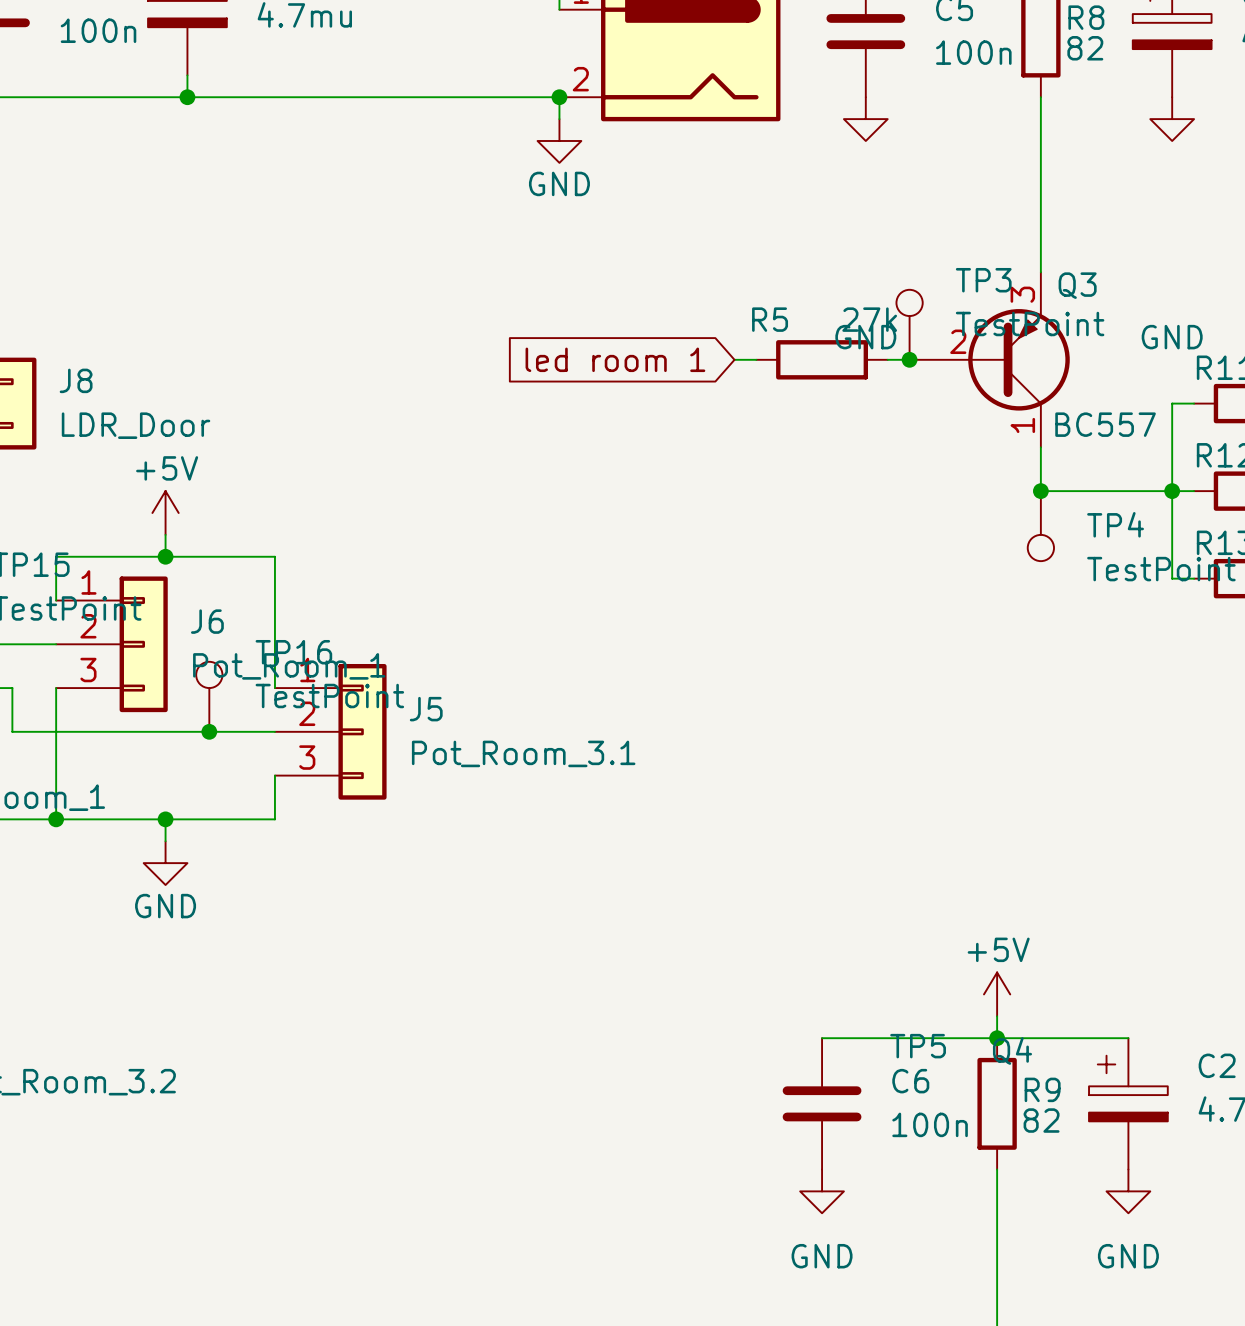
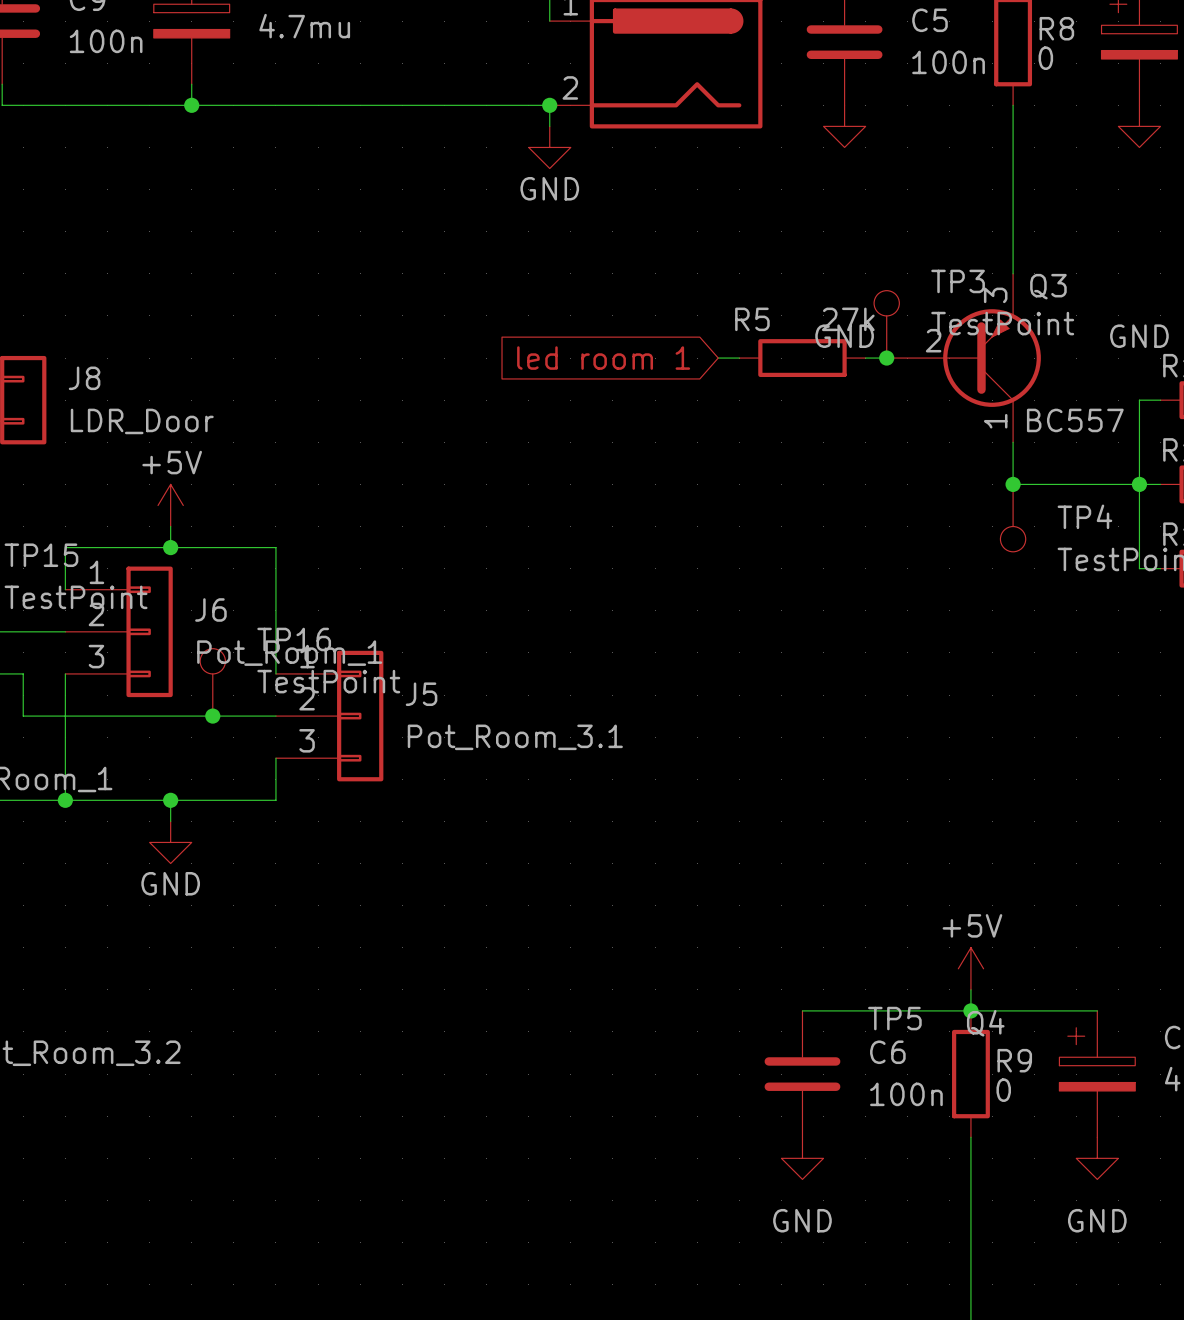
R8 value: 82 (1085, 48) -> 0 (1045, 58)
R9 value: 82 (1041, 1120) -> 0 (1003, 1090)

